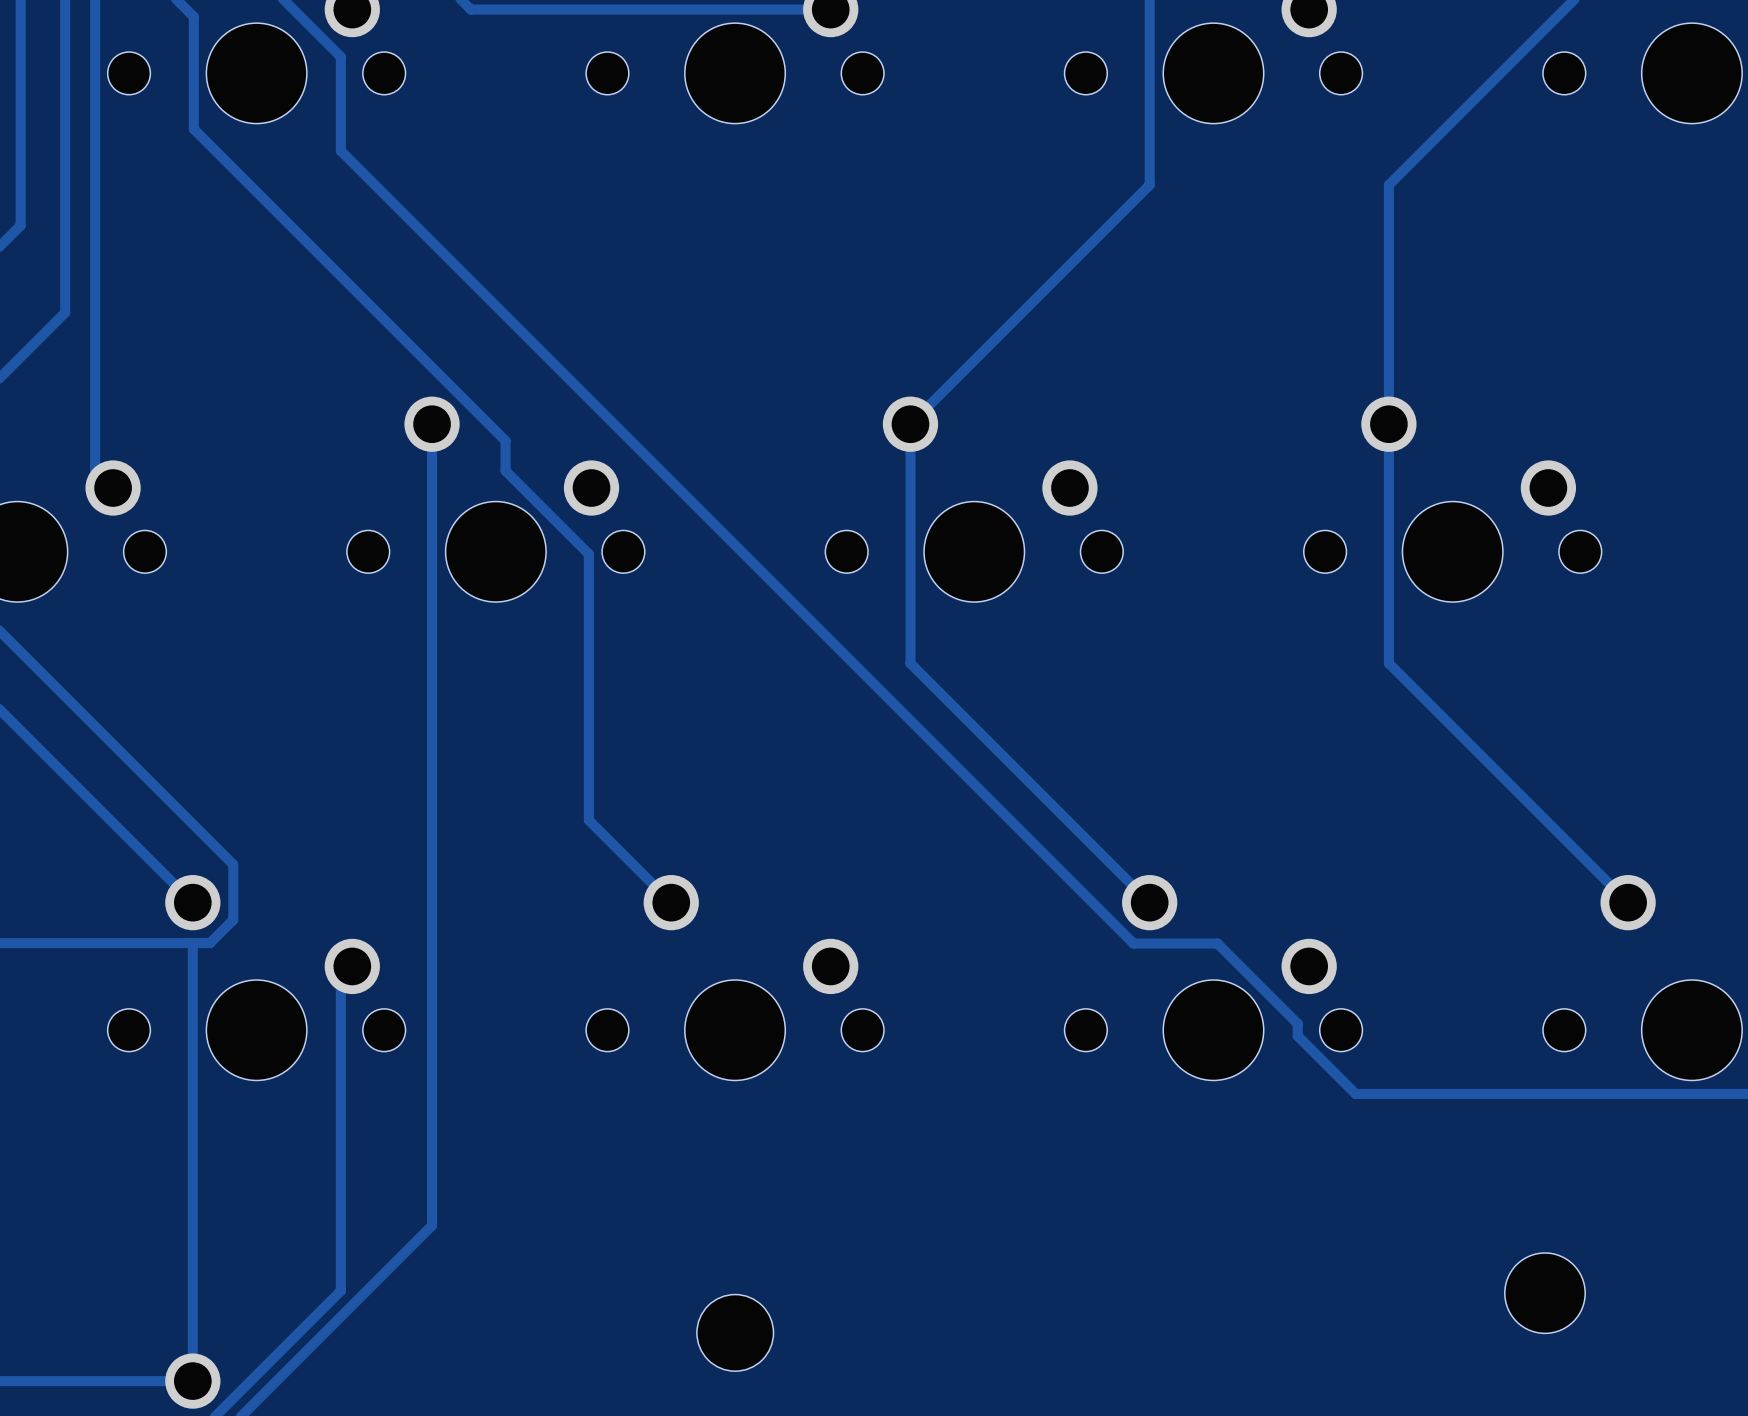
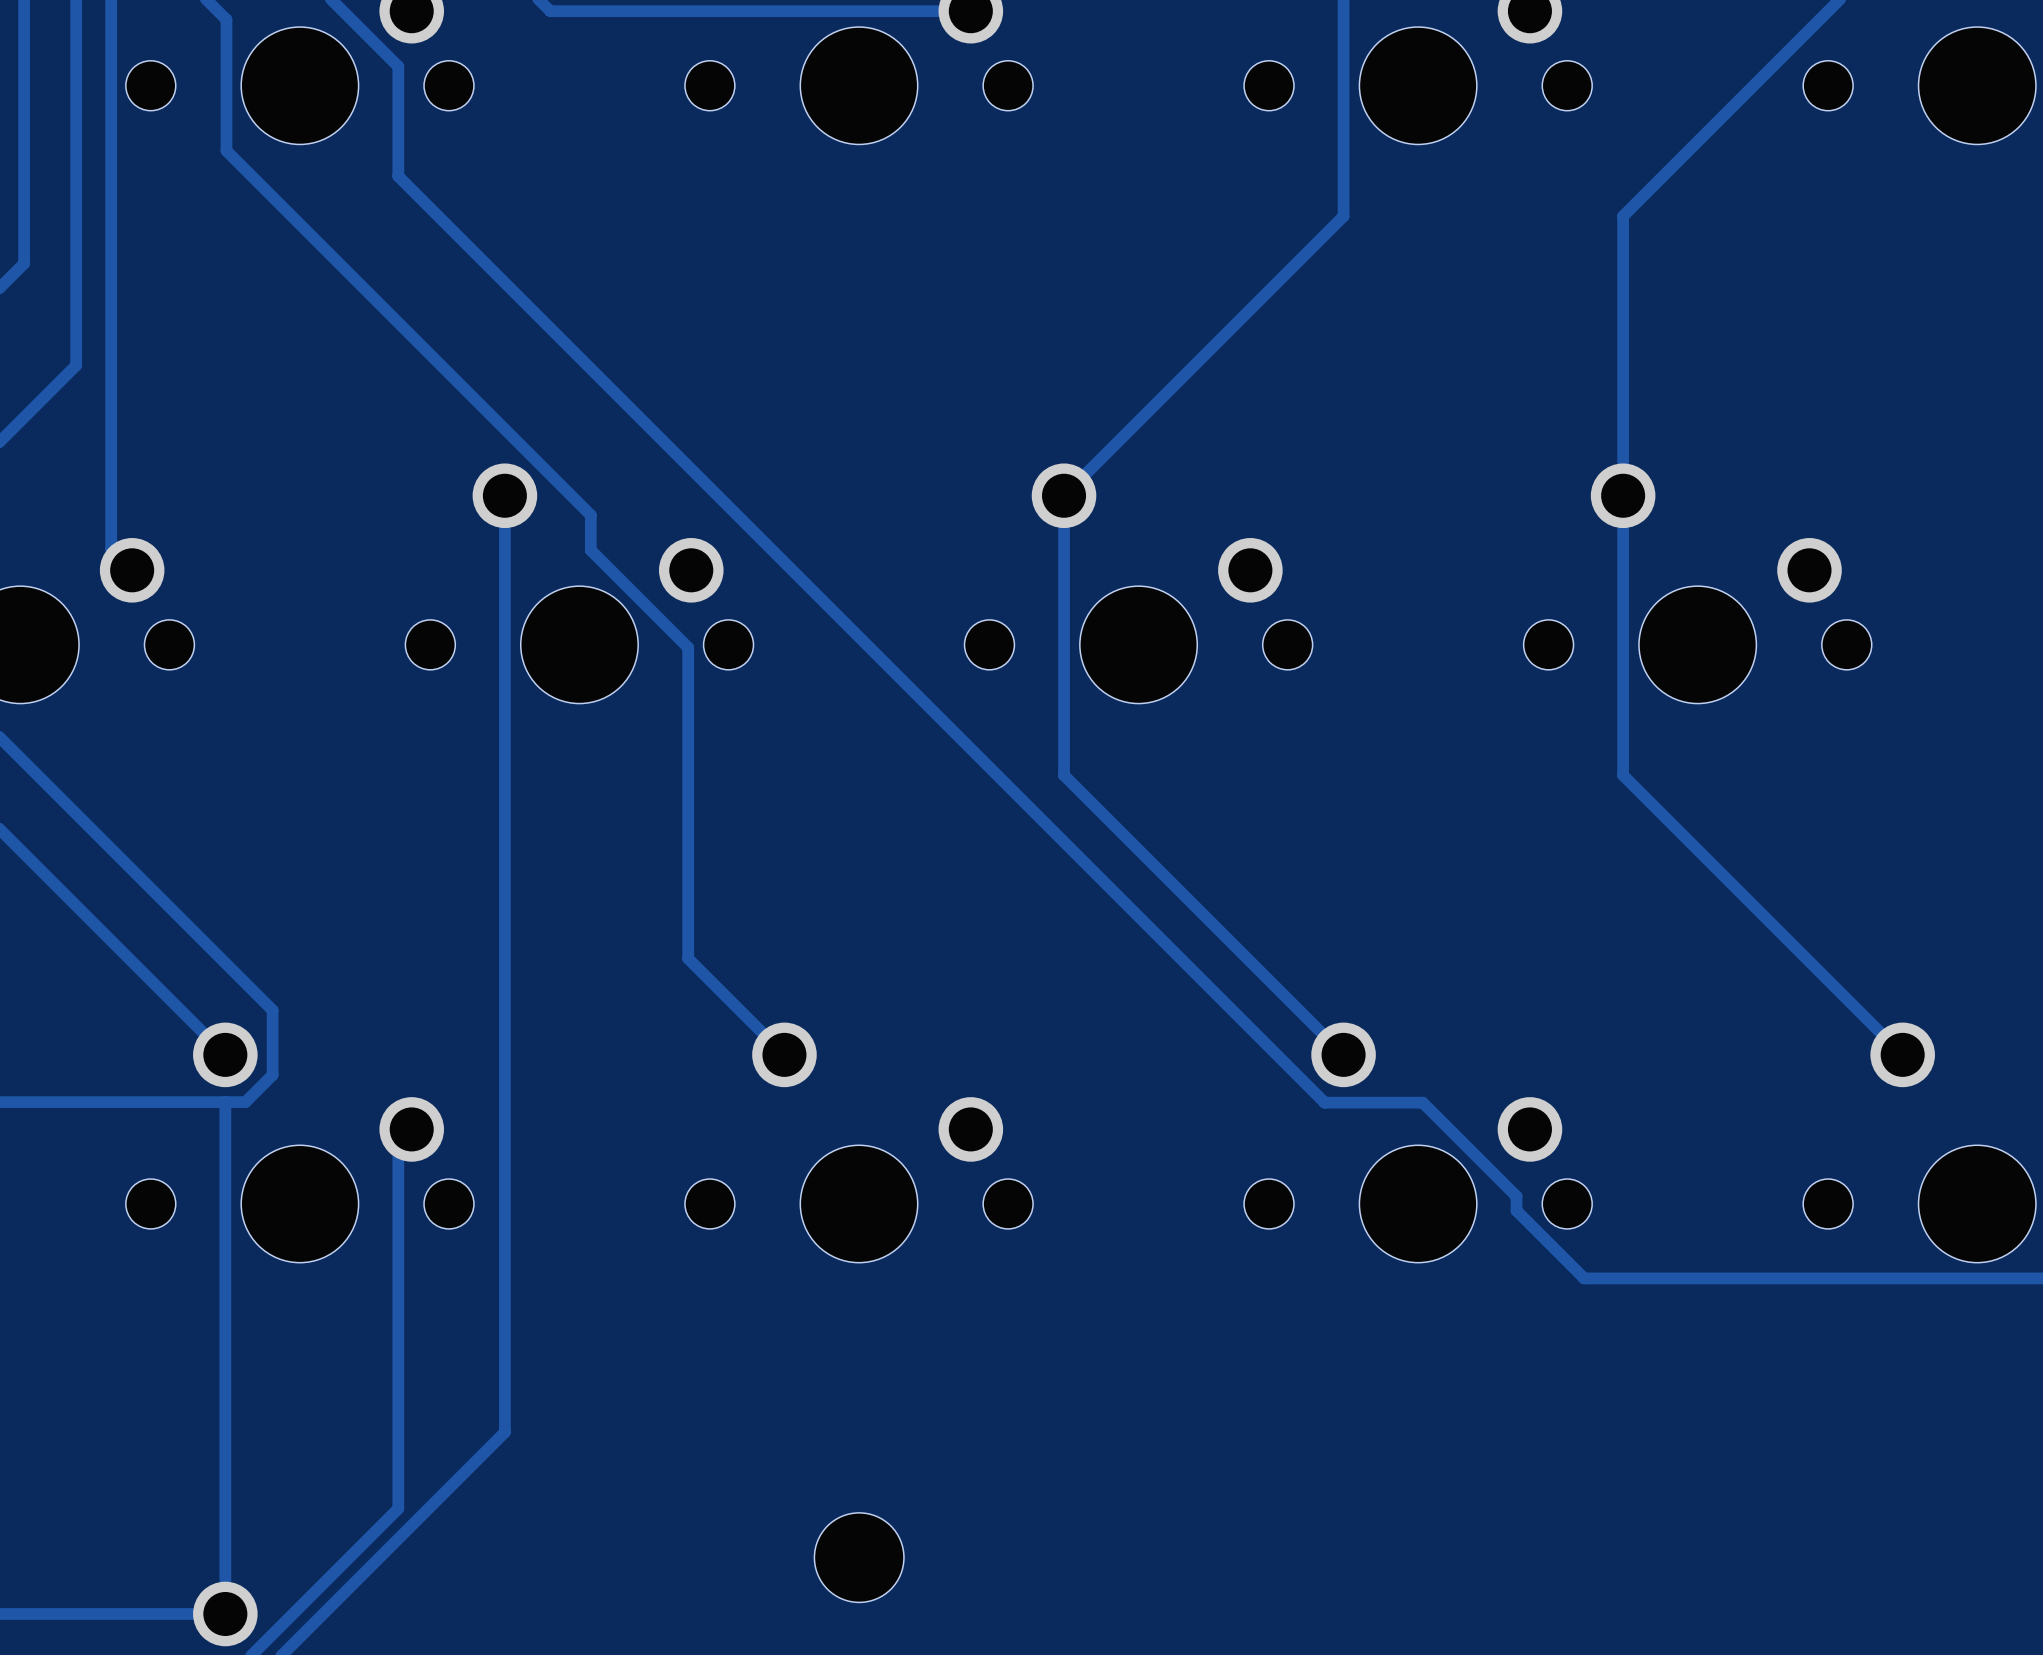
part: (1545, 1293) -> none

